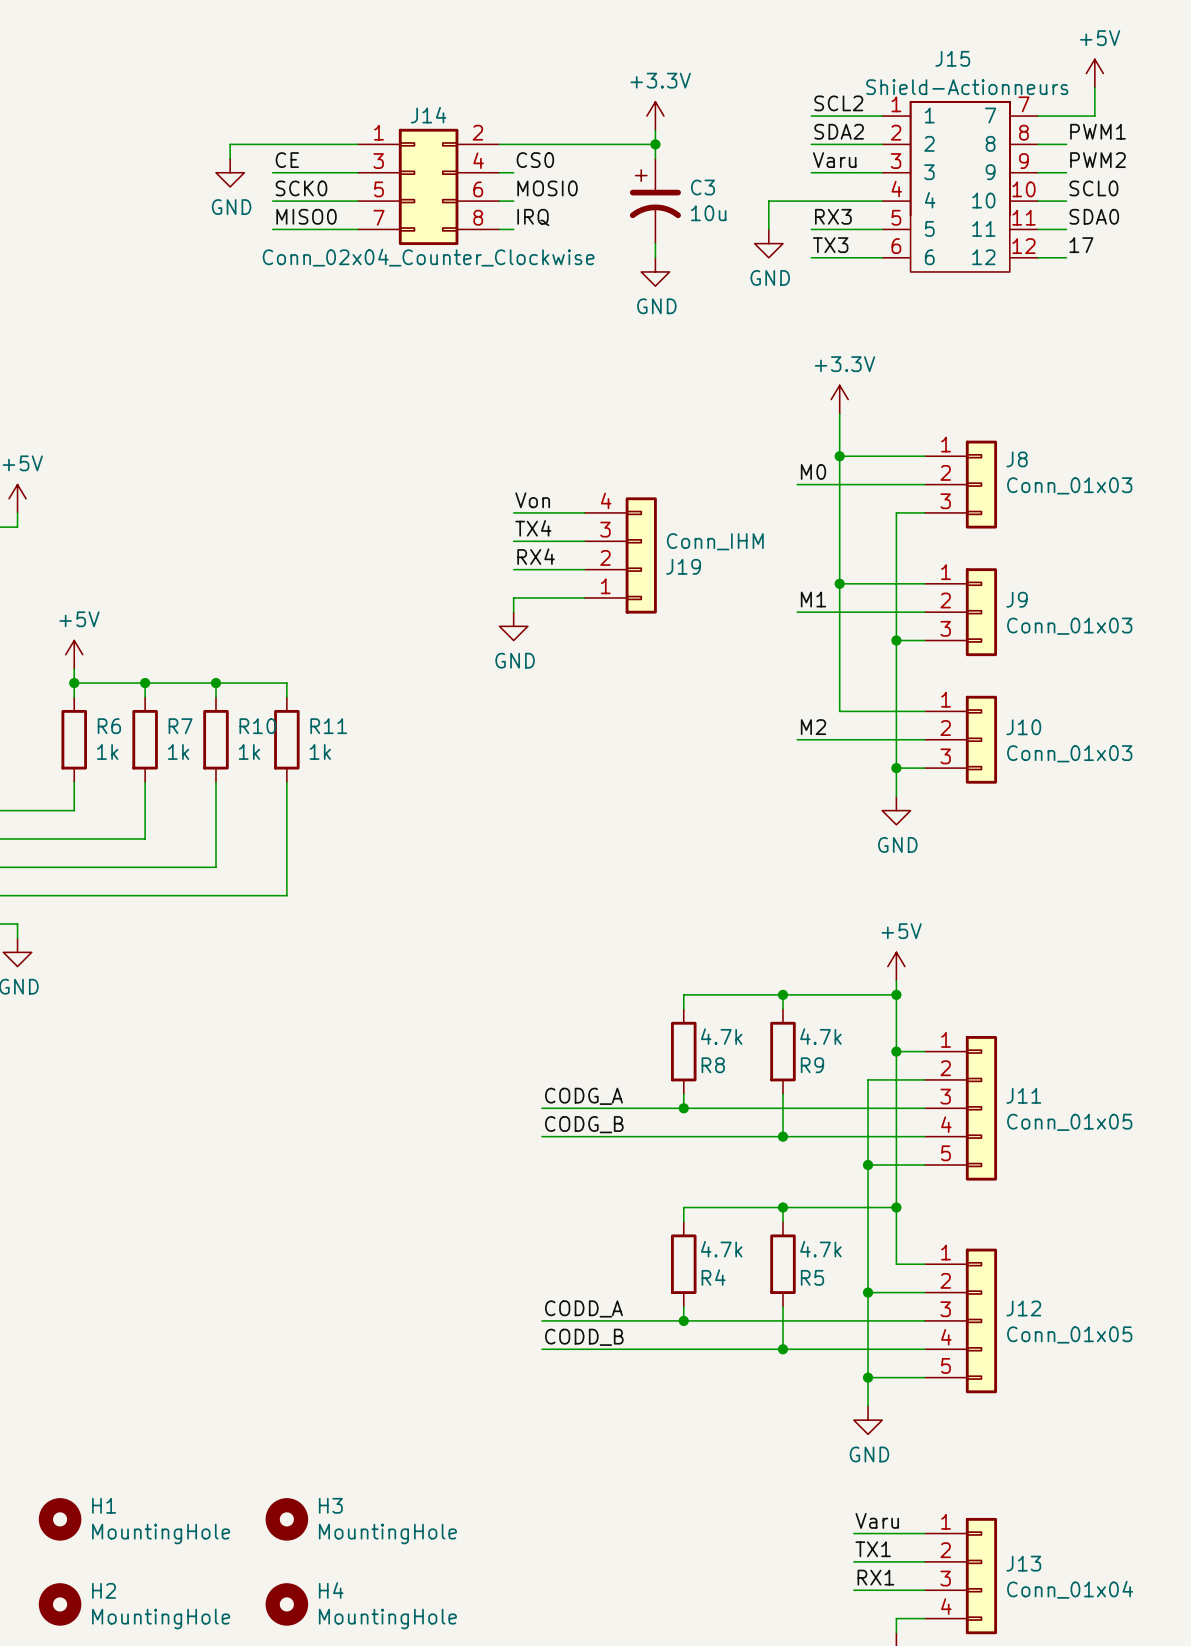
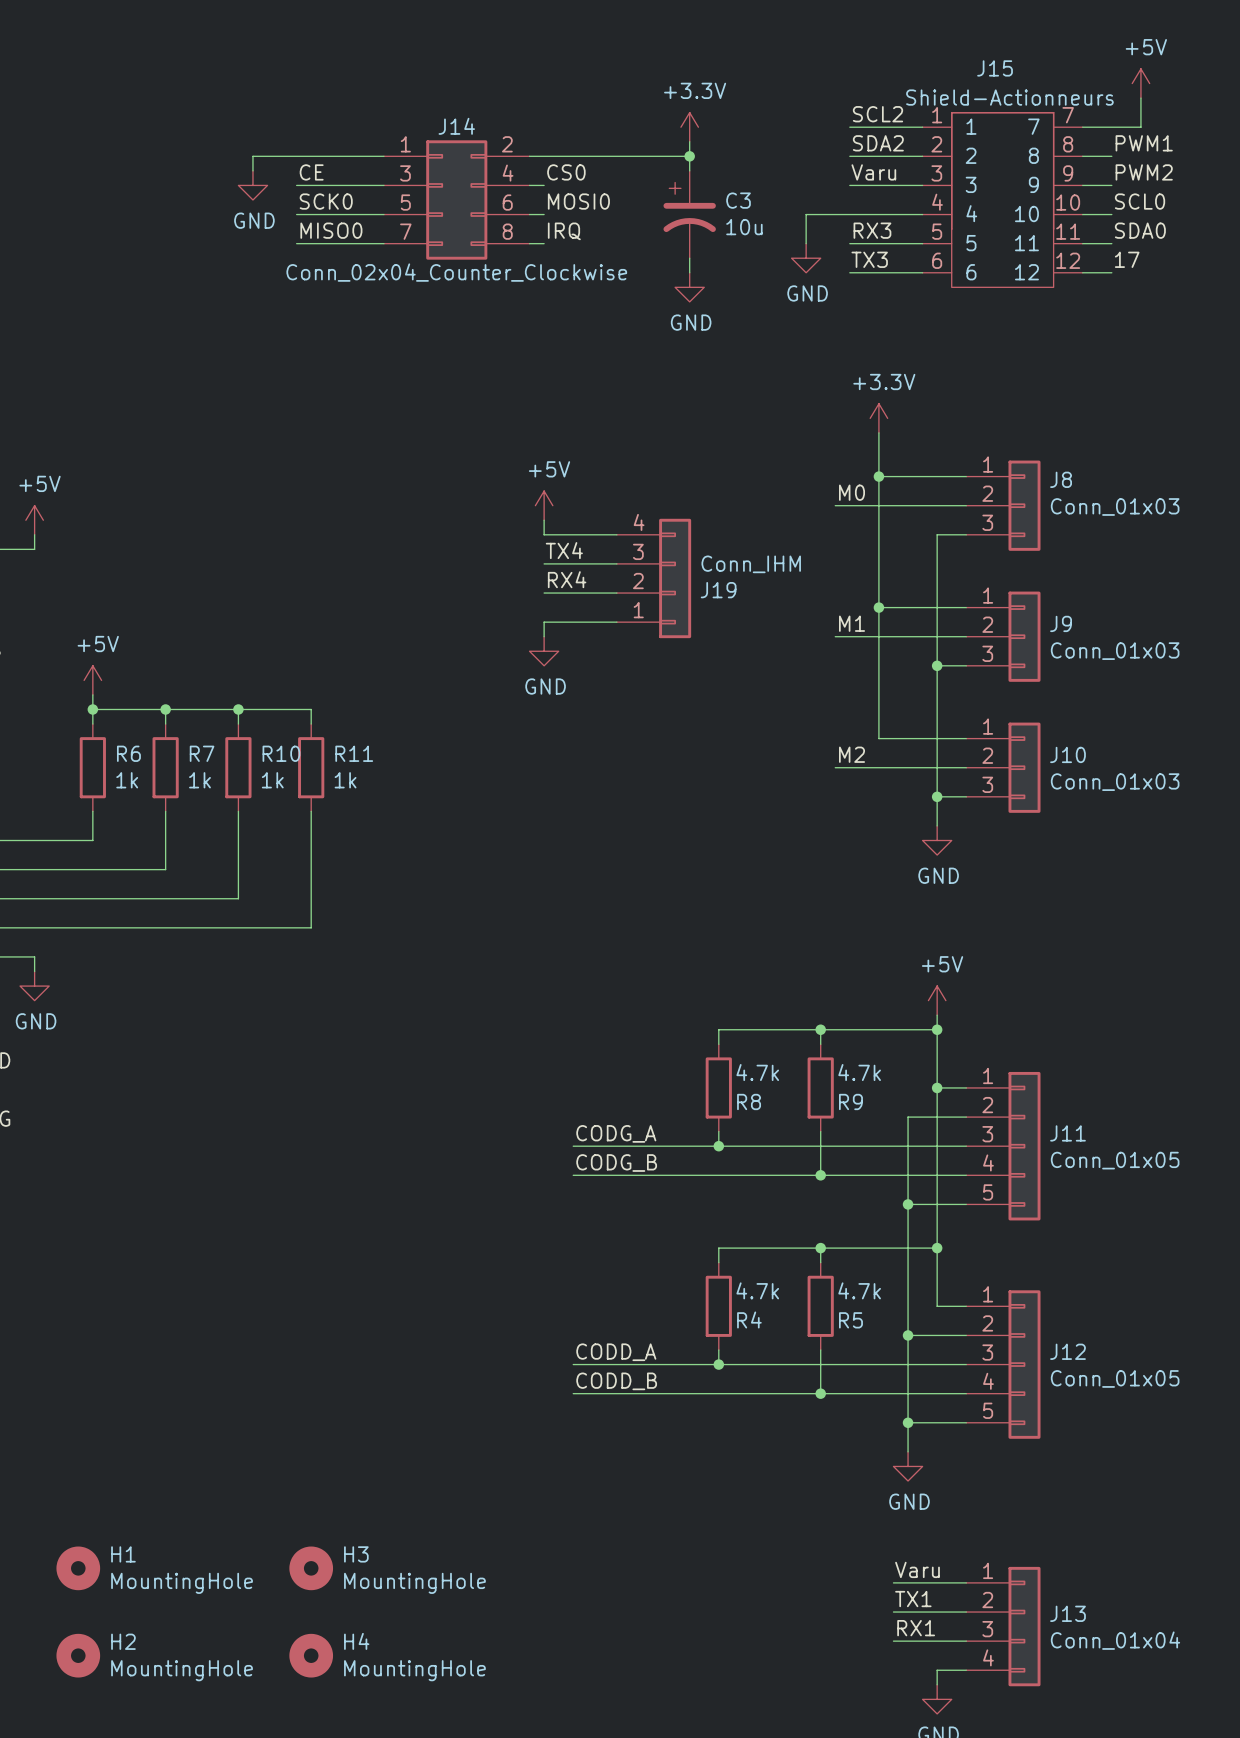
power symbol: none -> +5V (544, 505)
wire: none -> (544, 520) (544, 534)
label: Von (532, 500) -> none

